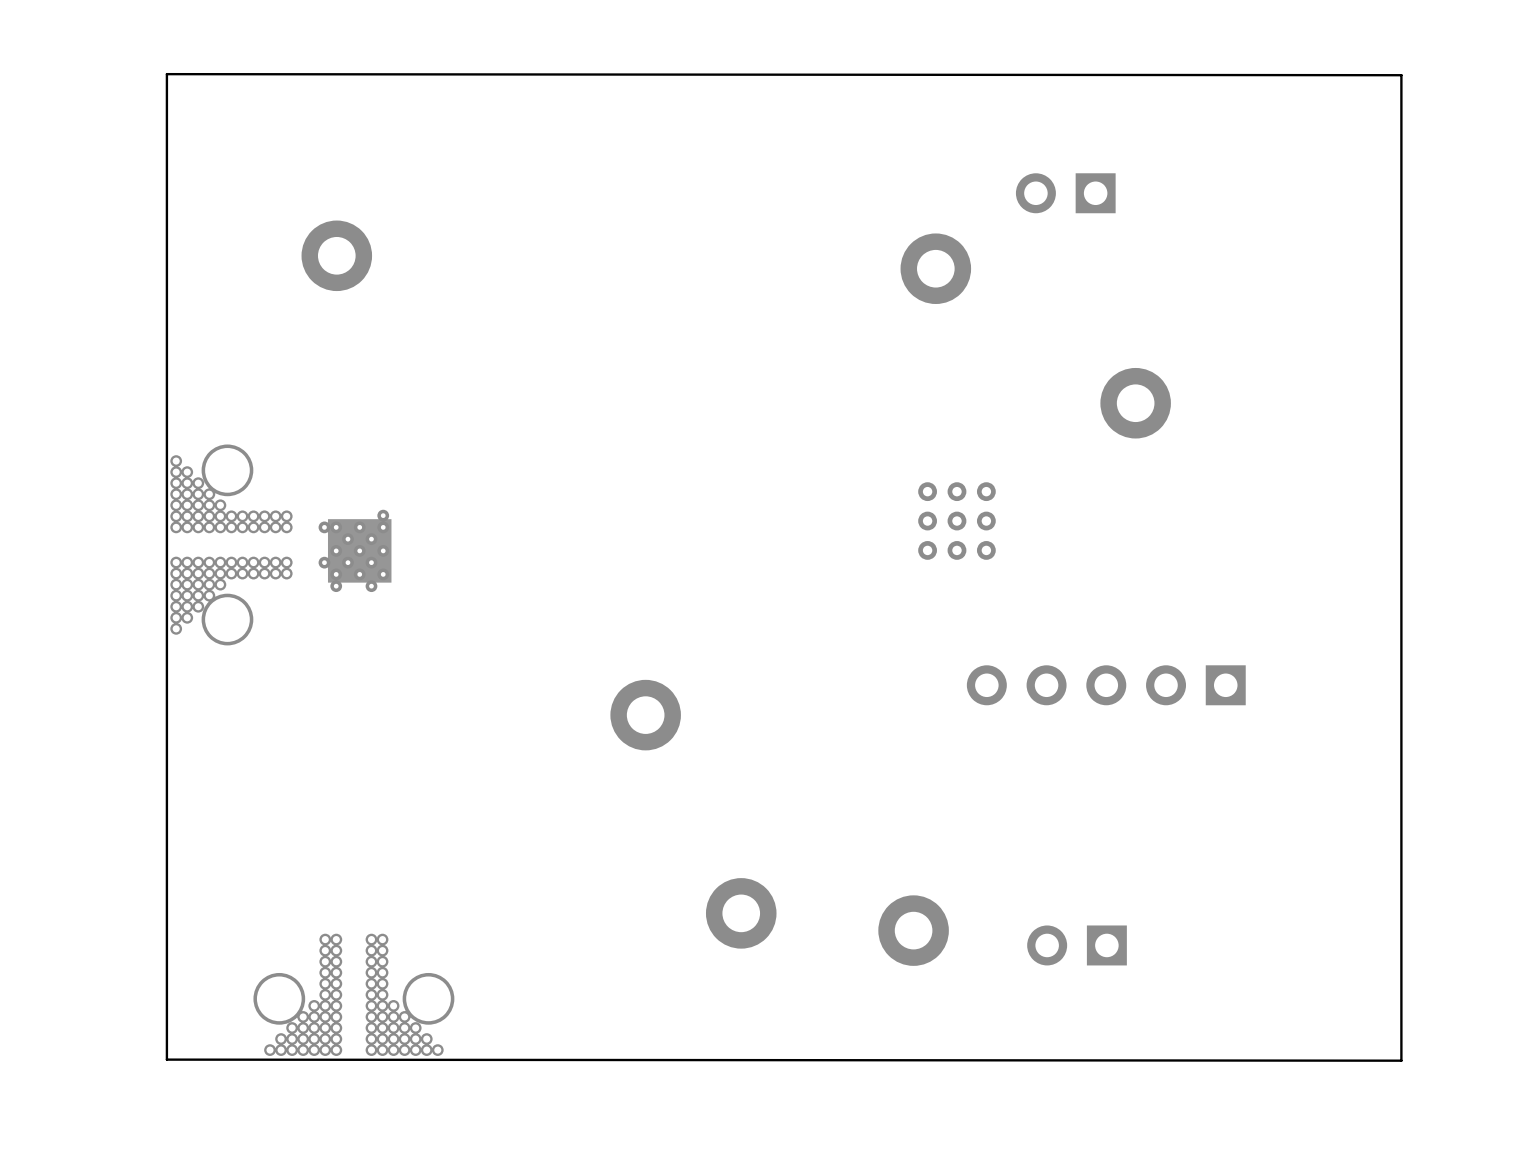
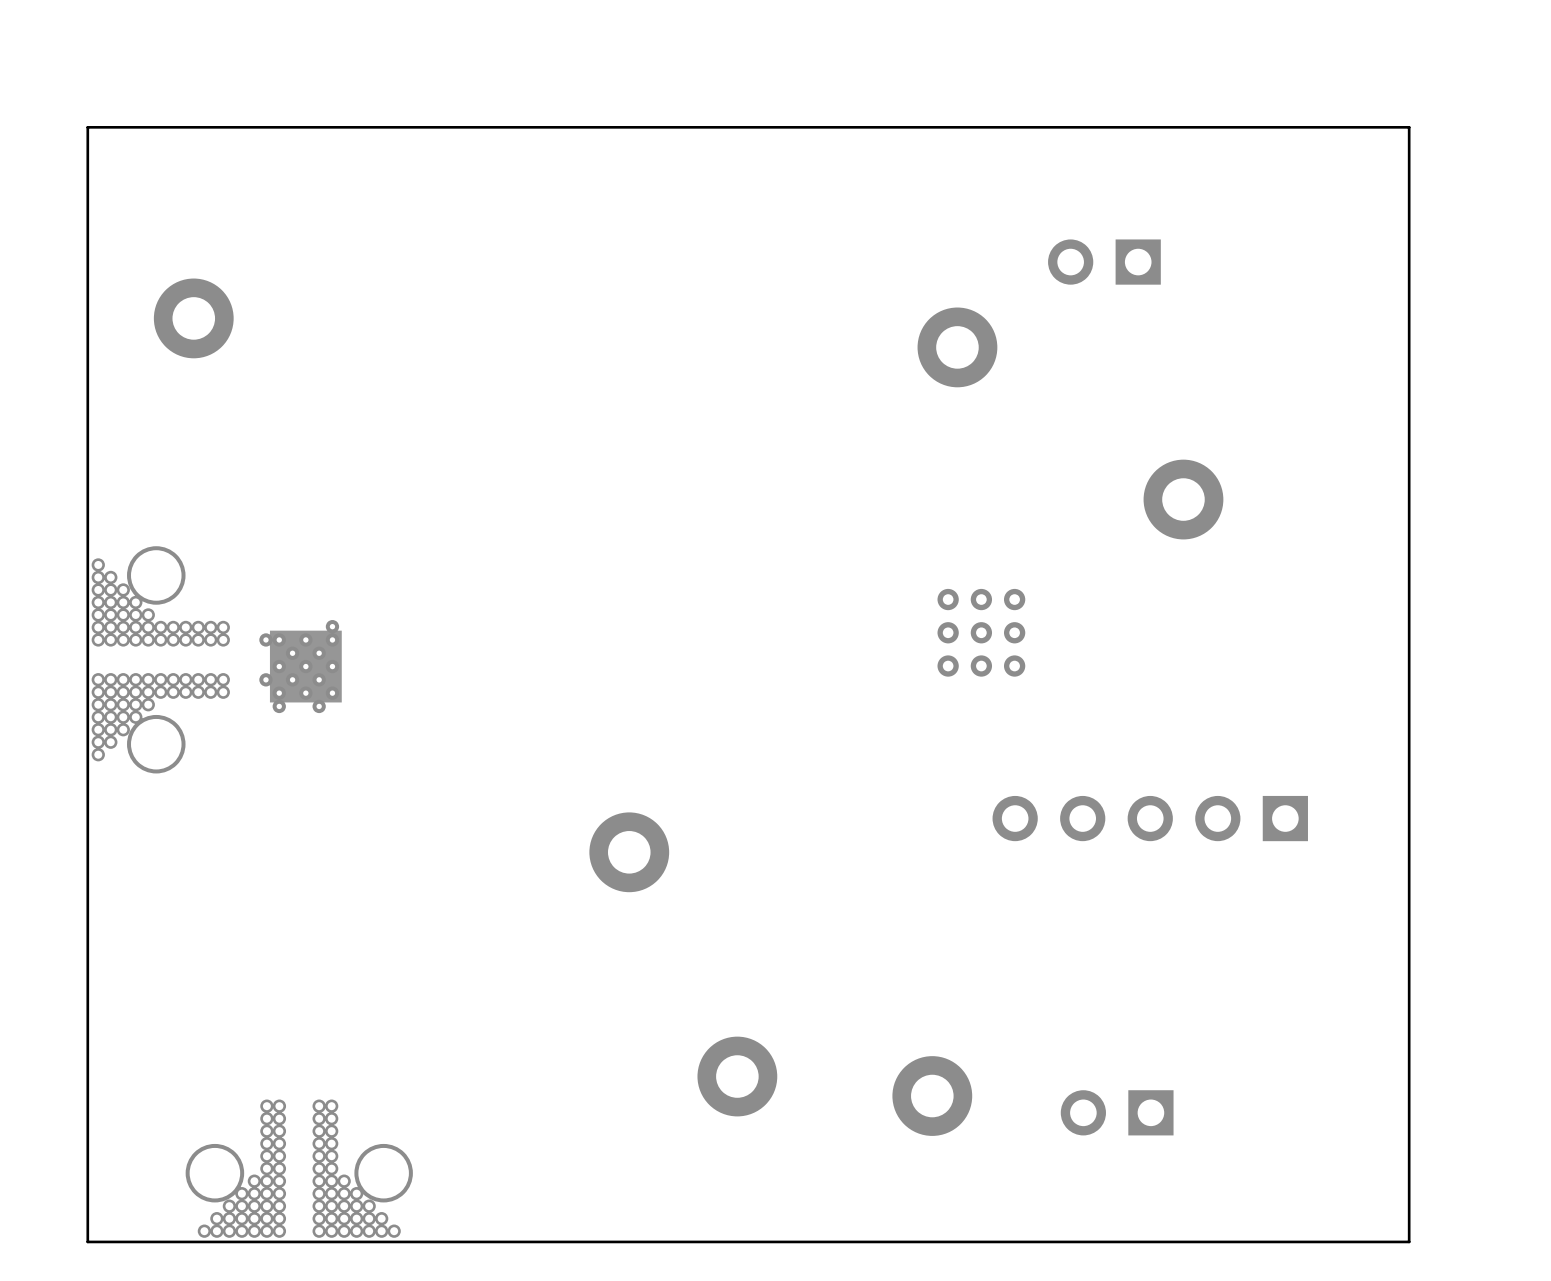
board edge: (166, 74) (1401, 75) (1401, 1060) (166, 1059) -> (87, 127) (1409, 127) (1409, 1241) (87, 1241)
part position: (336, 255) -> (193, 318)

